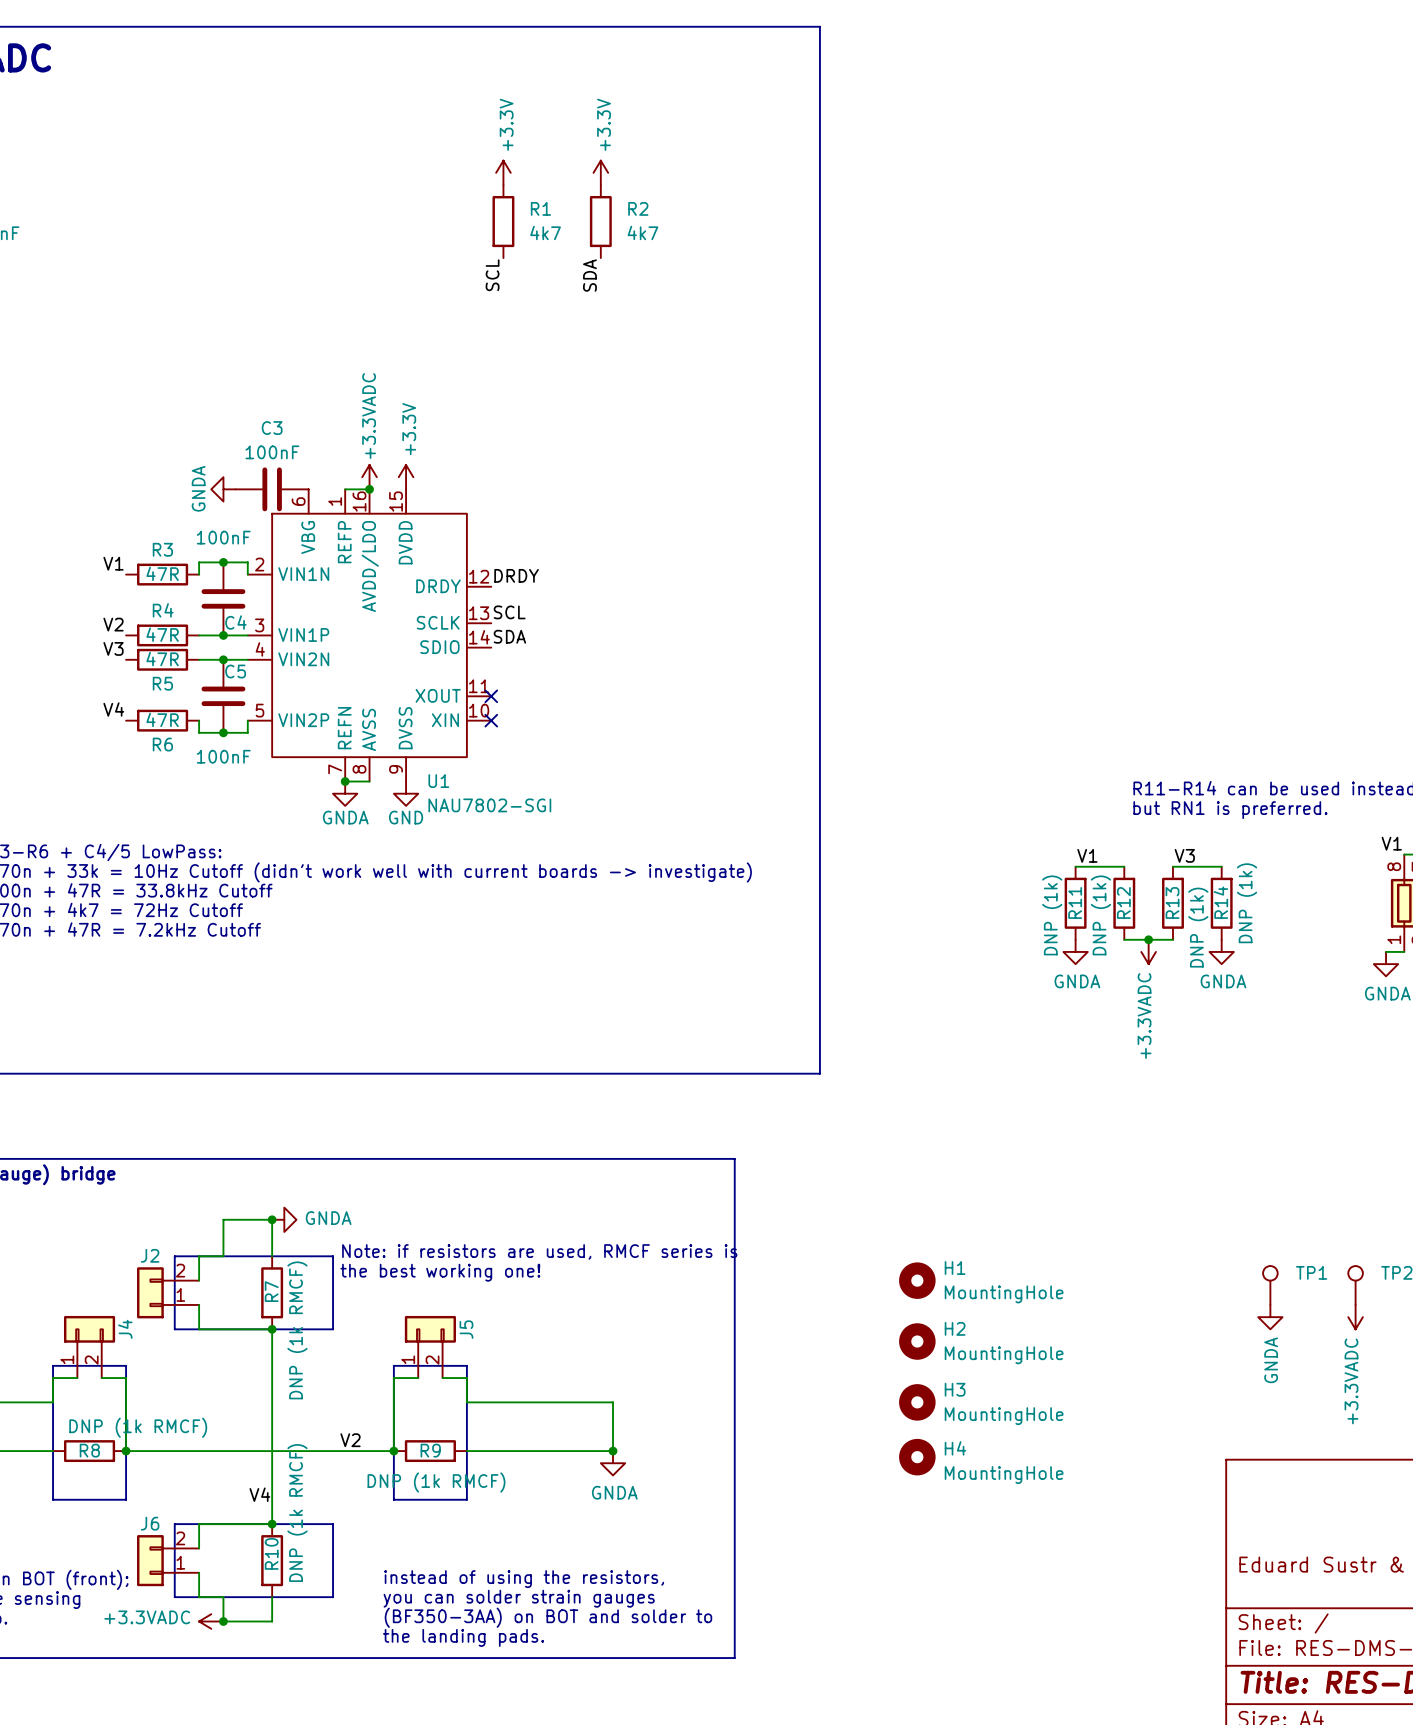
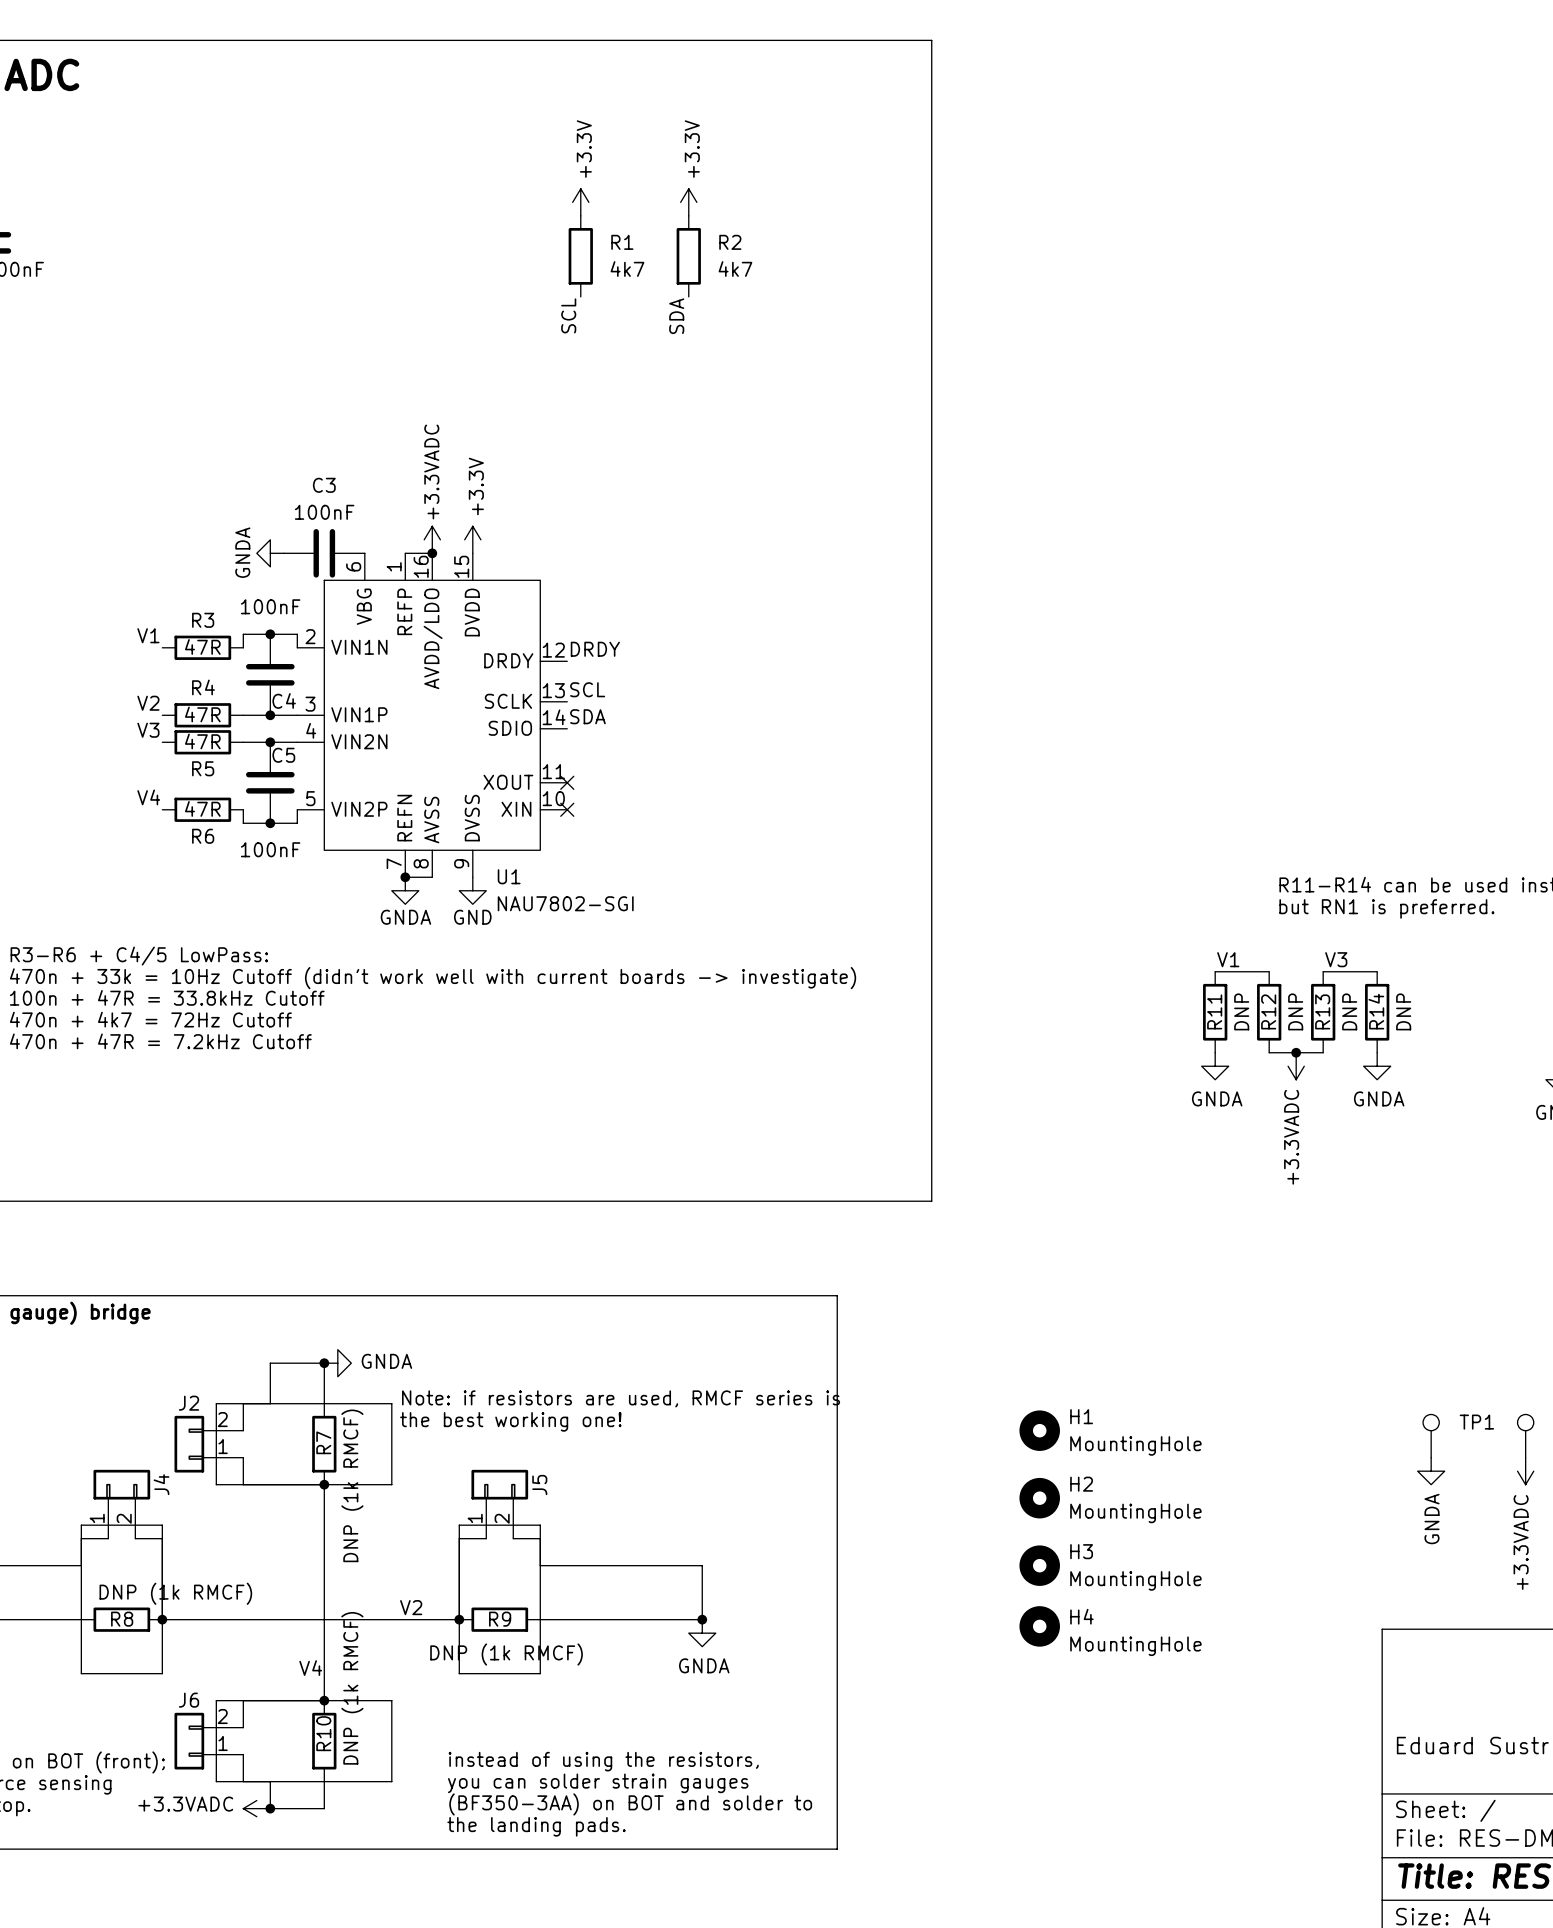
R14 value: DNP (1k) (1247, 903) -> DNP (1403, 1011)
R11 value: DNP (1k) (1052, 915) -> DNP (1241, 1011)
R12 value: DNP (1k) (1100, 915) -> DNP (1295, 1011)
R13 value: DNP (1k) (1198, 927) -> DNP (1349, 1011)

